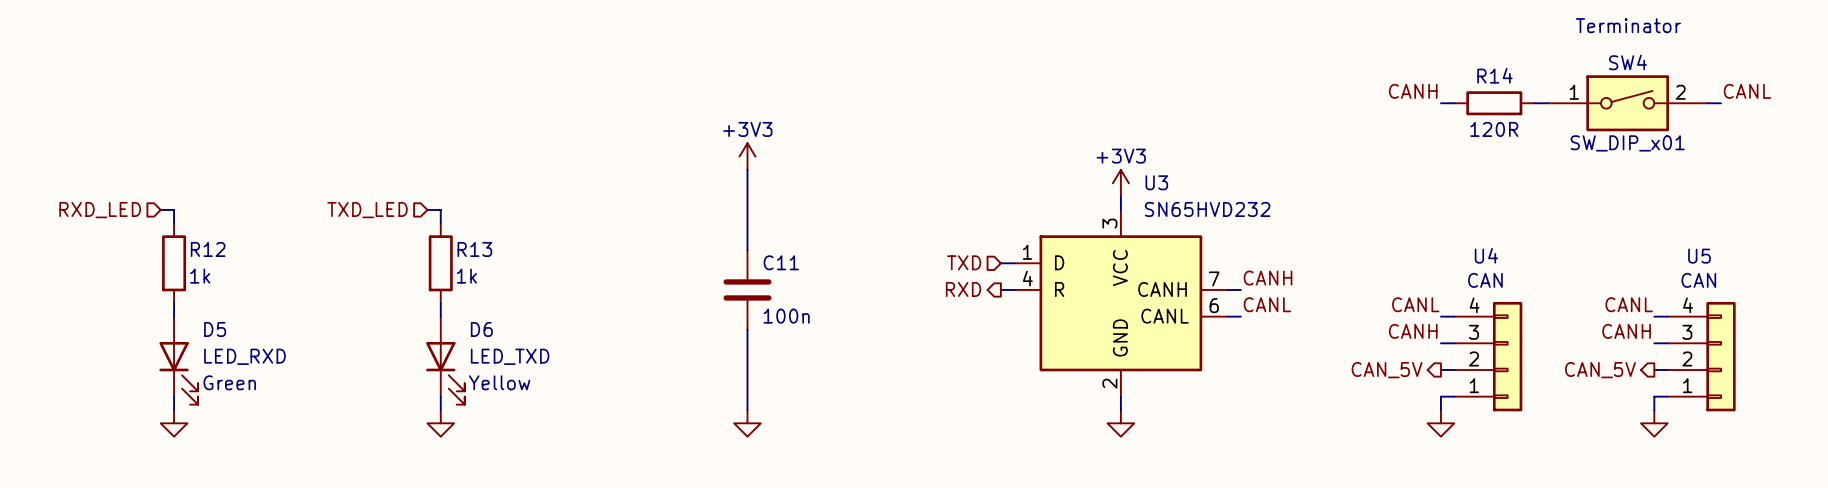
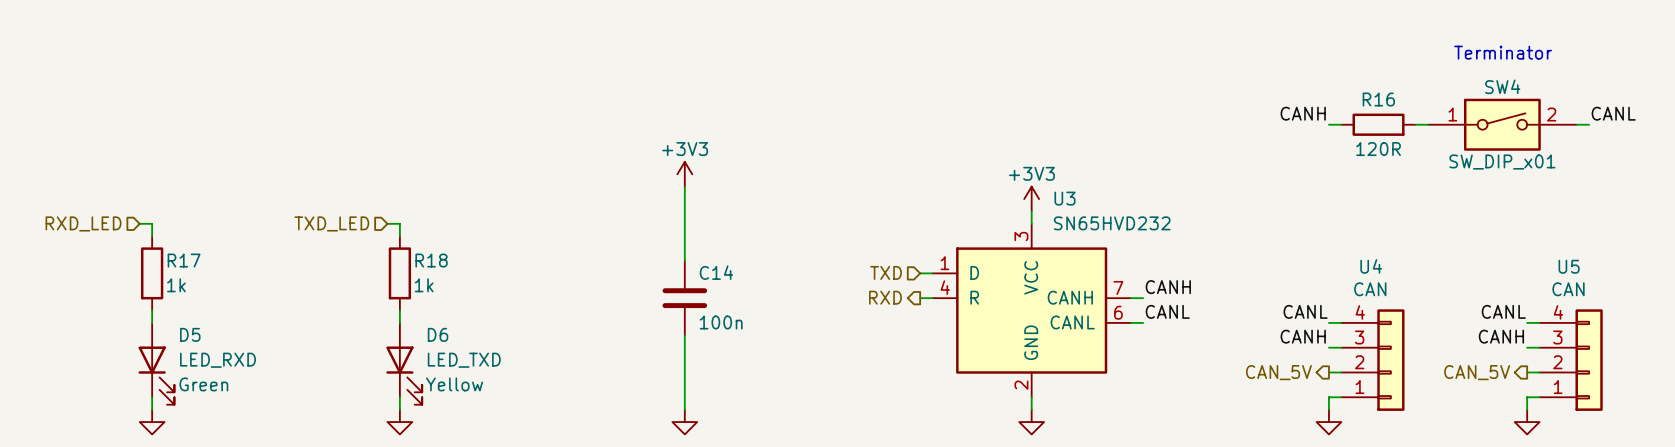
R14 name: R14 (1494, 75) -> R16 (1378, 99)
R12 name: R12 (208, 249) -> R17 (184, 260)
R13 name: R13 (474, 249) -> R18 (431, 260)
C11 name: C11 (781, 262) -> C14 (716, 272)

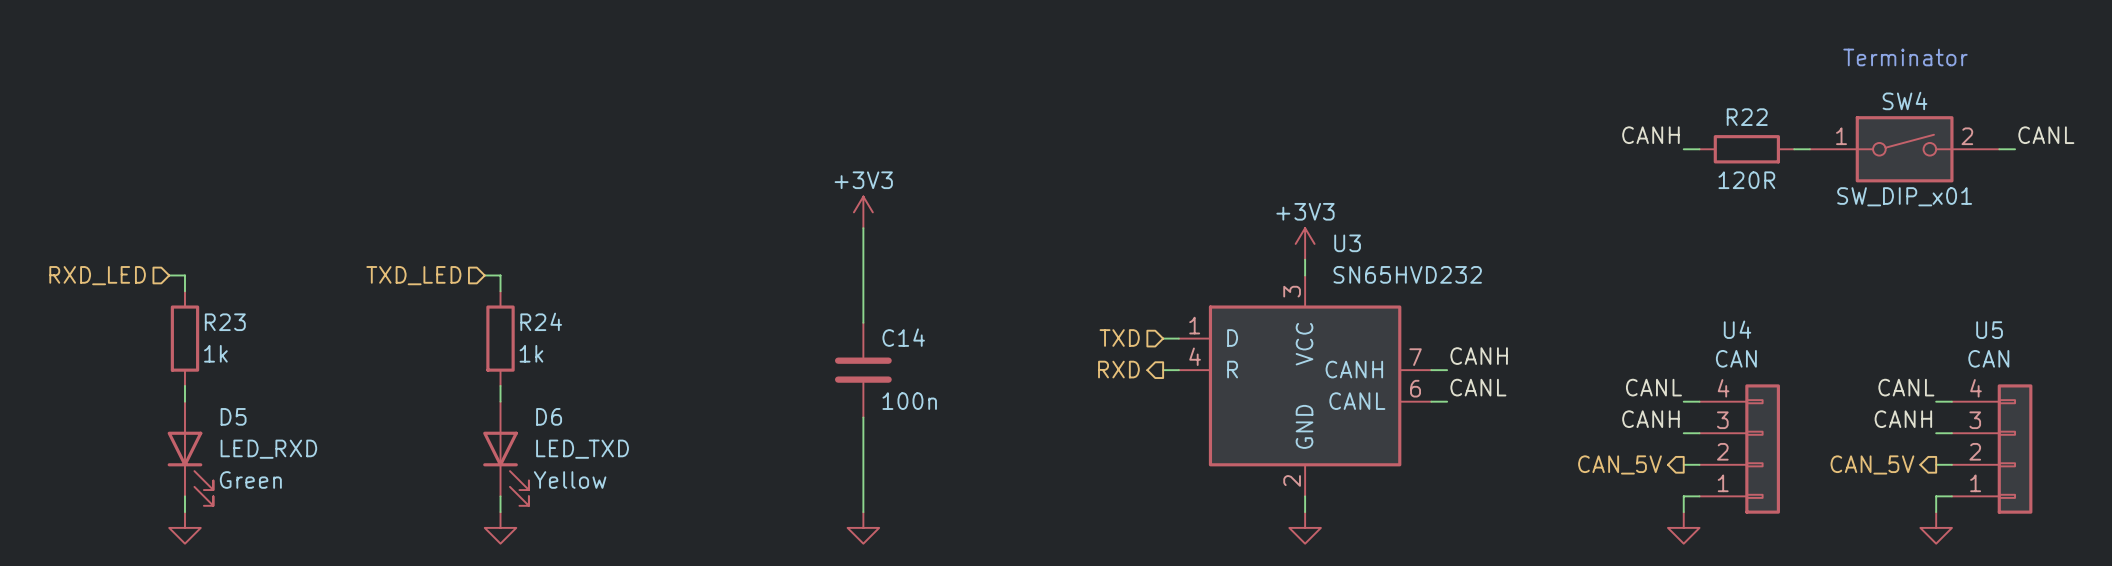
R16 name: R16 (1378, 99) -> R22 (1747, 117)
R17 name: R17 (184, 260) -> R23 (225, 322)
R18 name: R18 (431, 260) -> R24 (541, 321)

